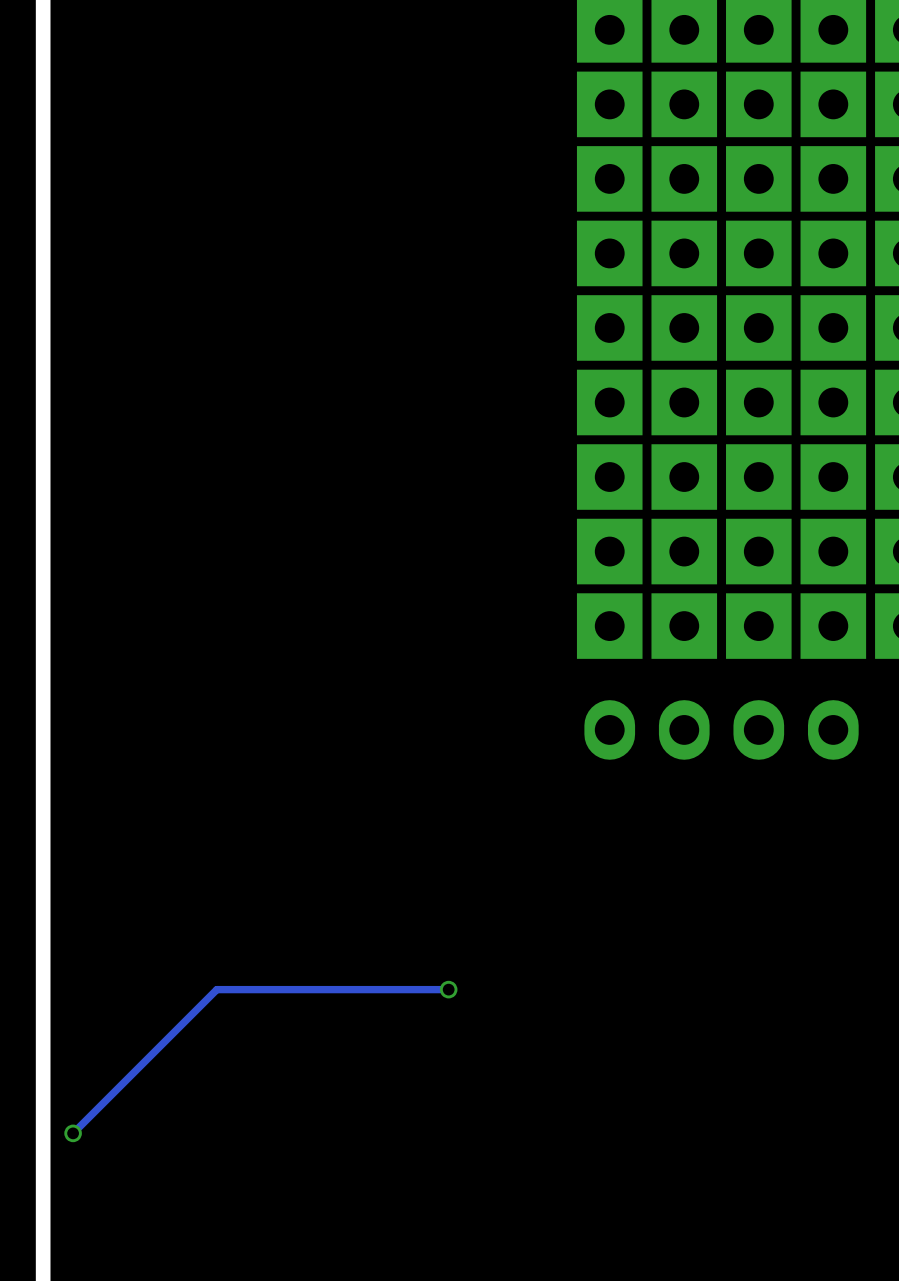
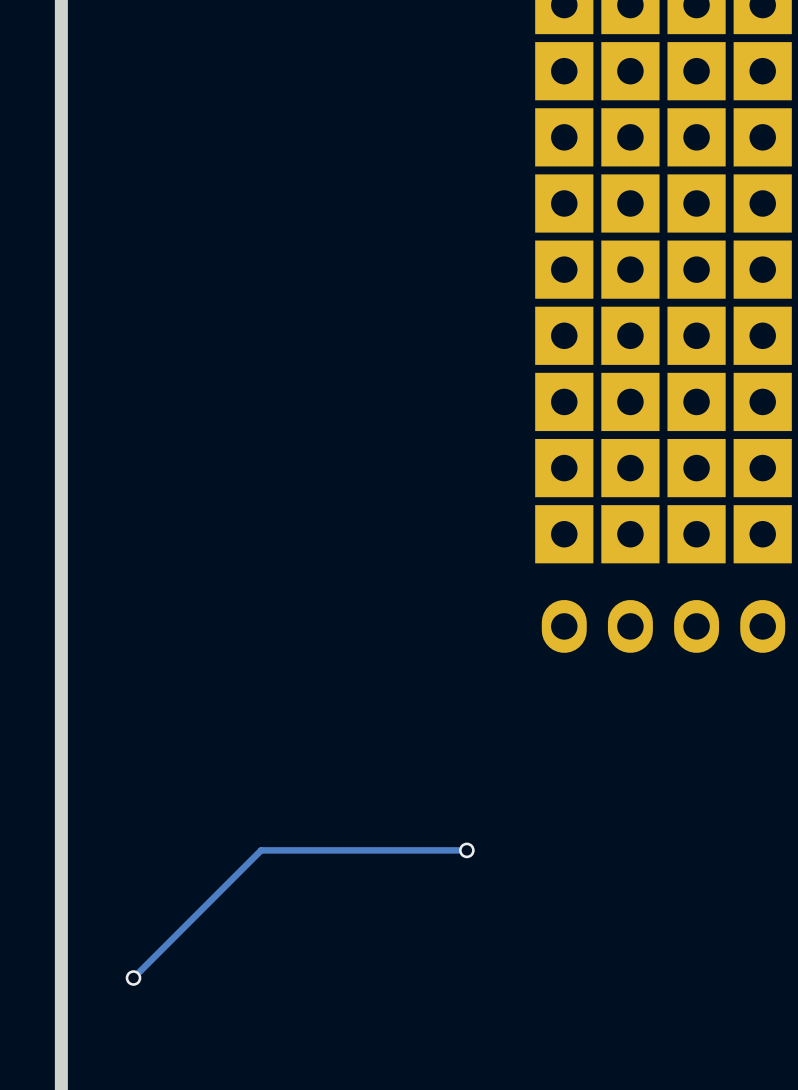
track: (448, 989) (216, 989) (73, 1133) -> (466, 850) (261, 850) (133, 978)
via position: (448, 989) -> (466, 850)
via position: (73, 1133) -> (133, 978)

